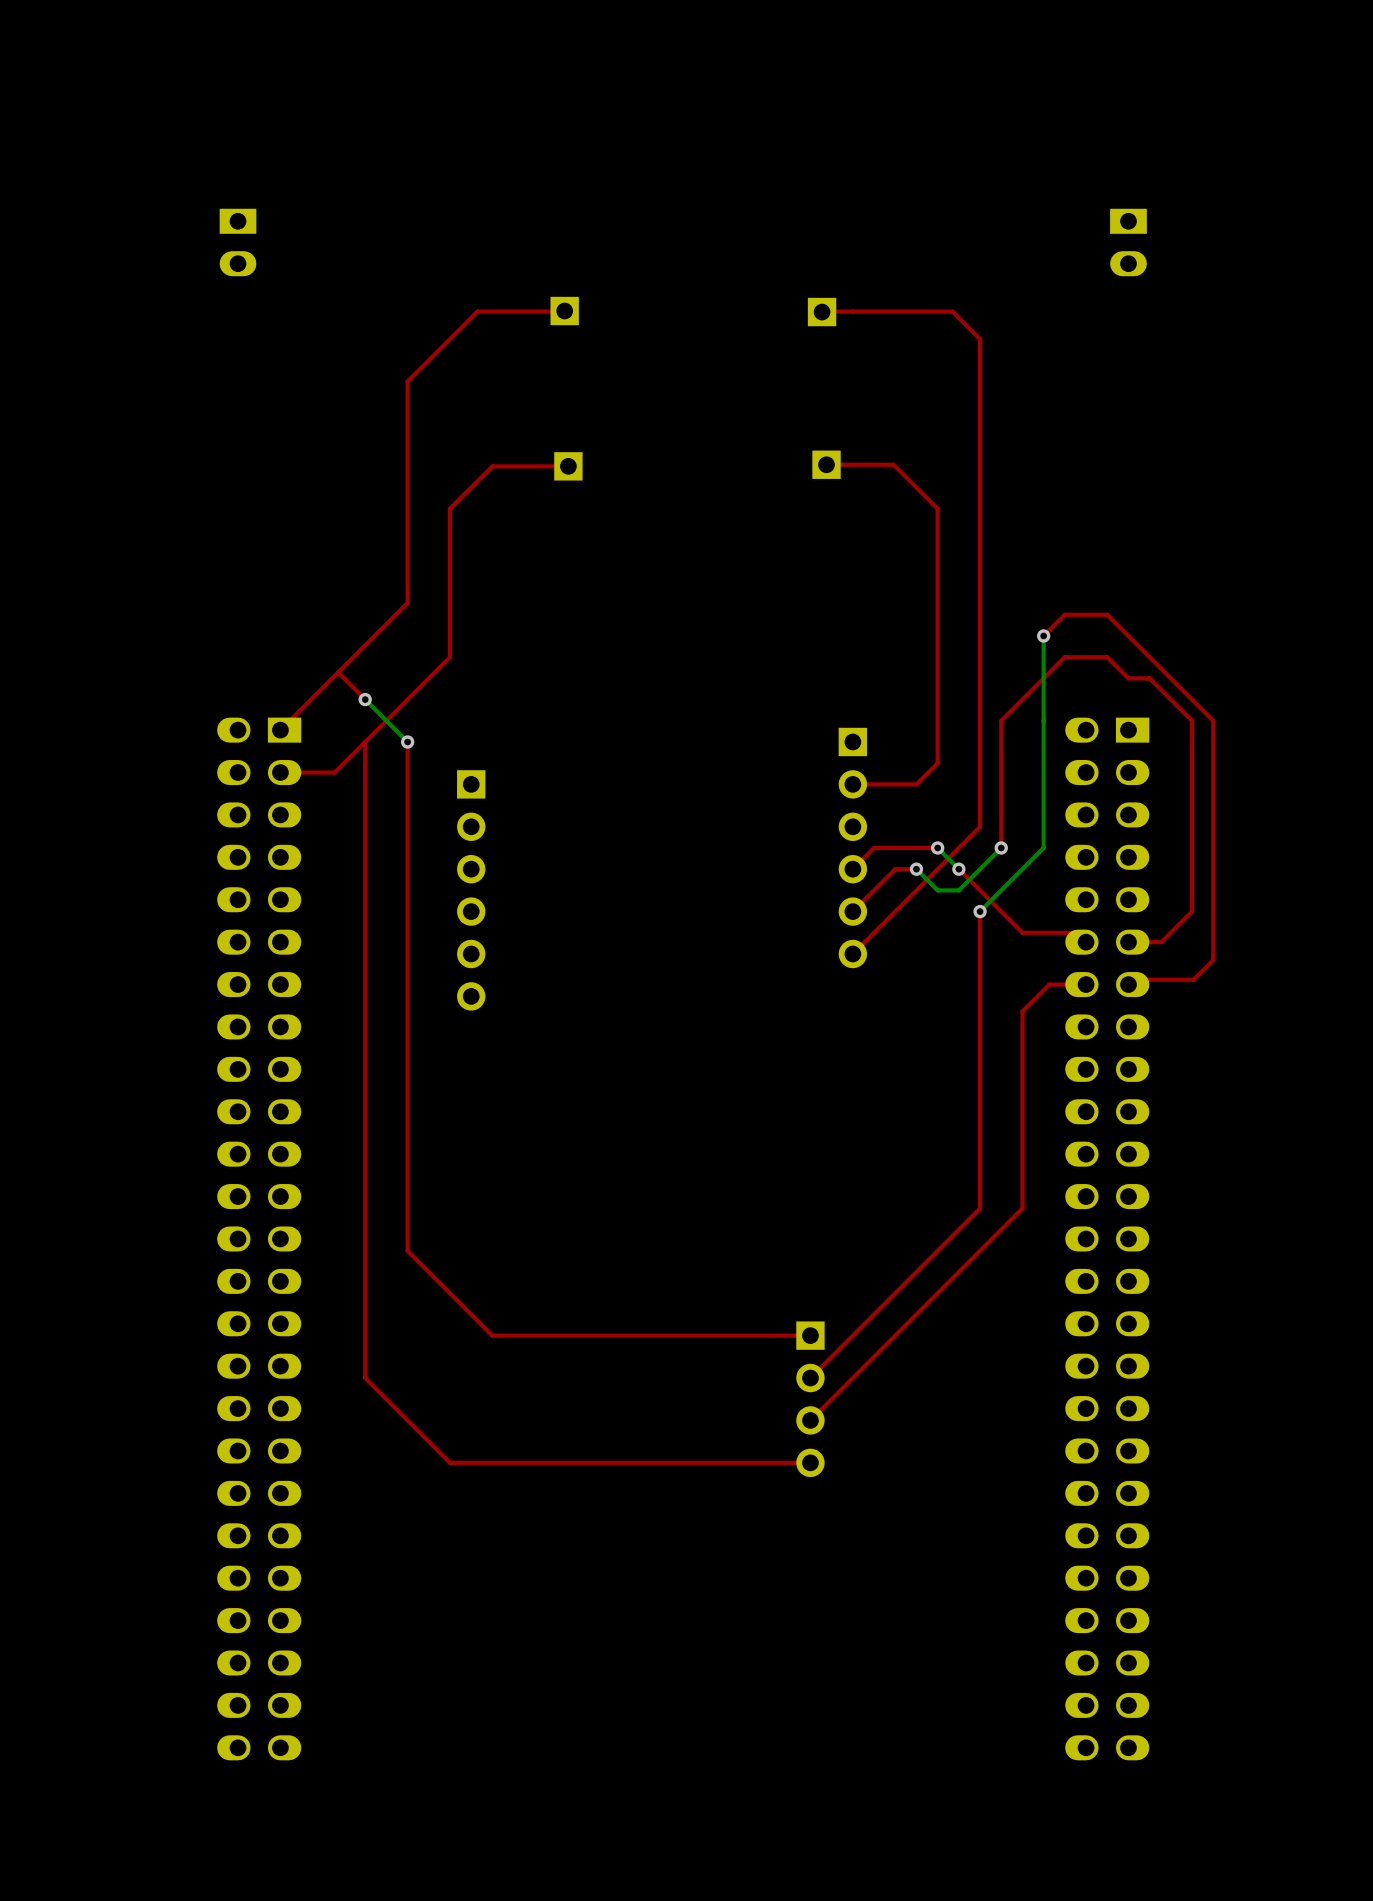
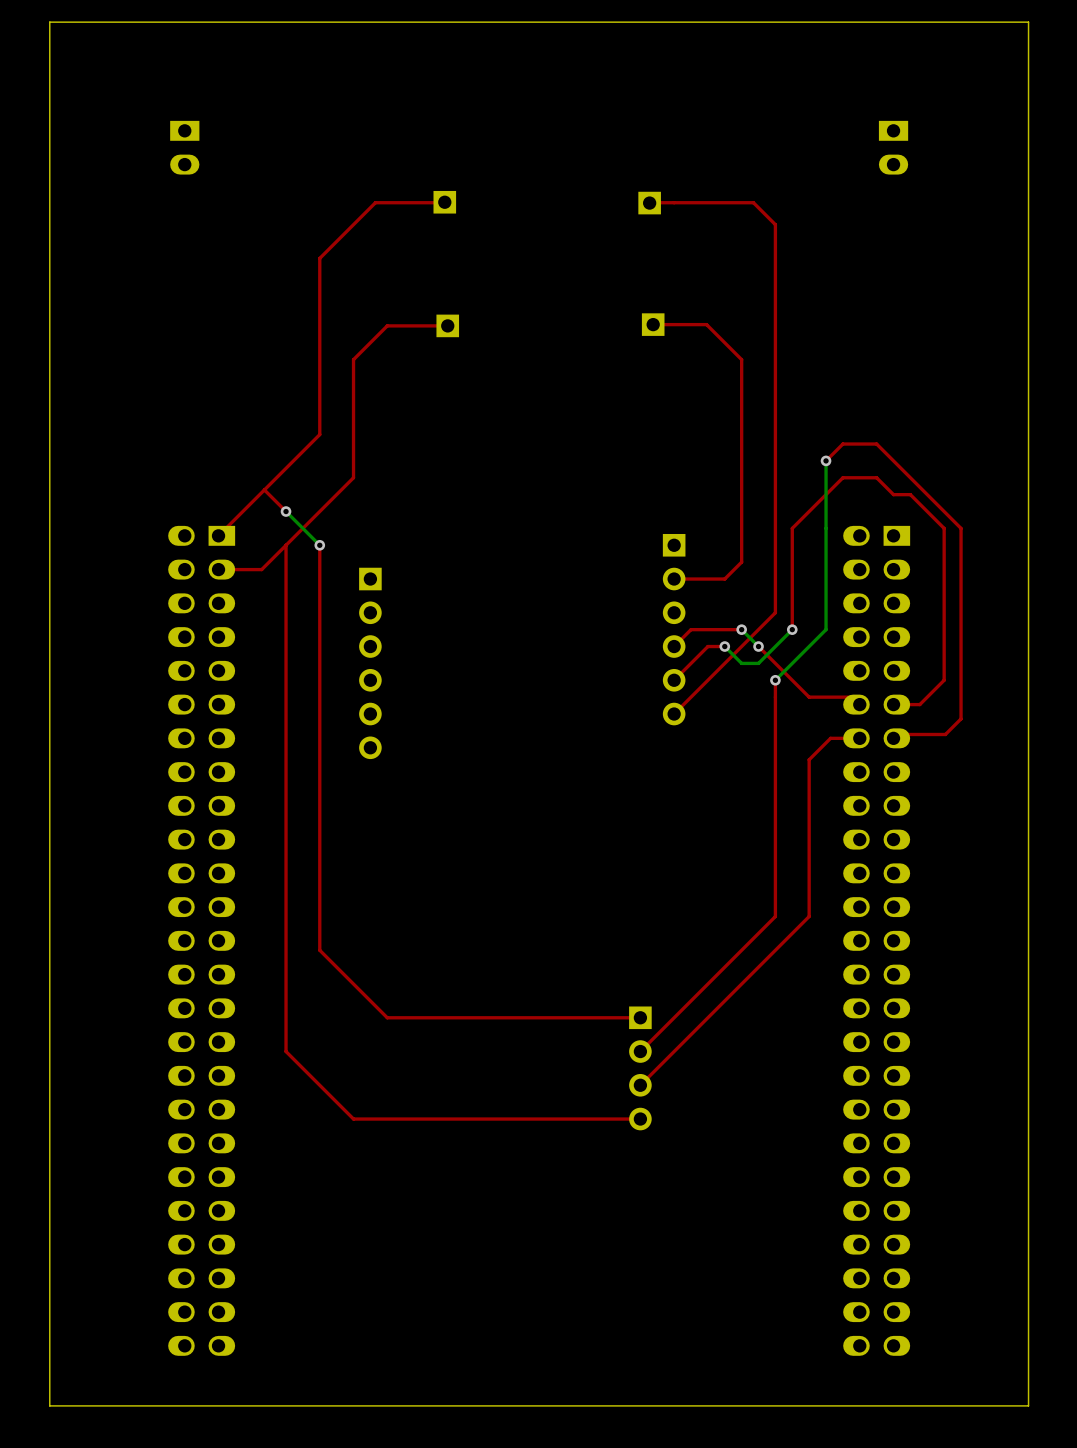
board edge: none -> (1028, 22) (49, 22) (49, 1405) (1028, 1405) (1028, 22)

